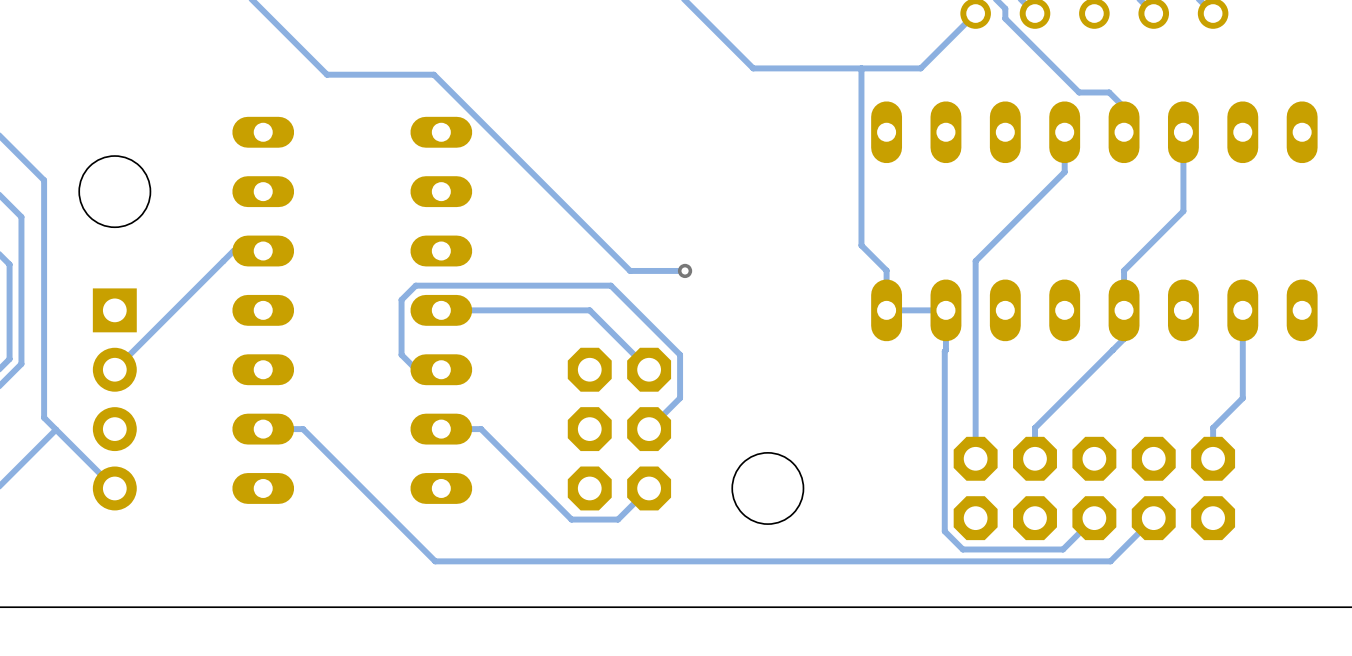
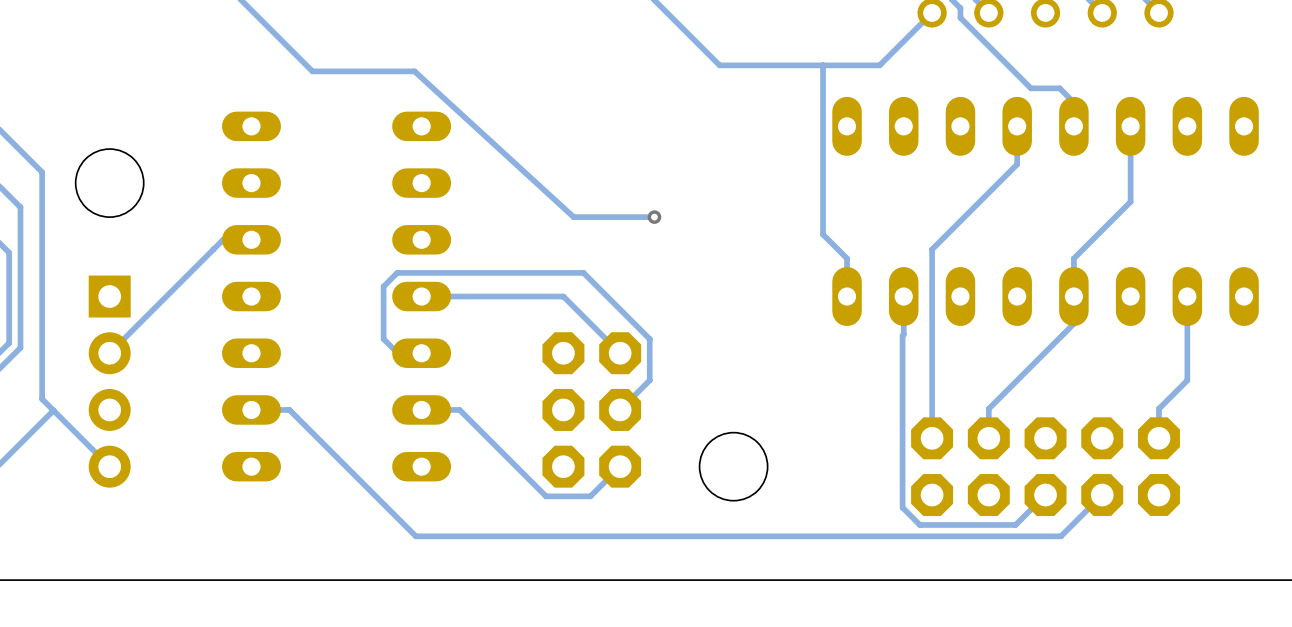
track: (433, 74) (630, 270) (685, 270) -> (414, 71) (573, 217) (654, 217)
via position: (685, 270) -> (654, 217)
track: (945, 310) (886, 310) -> none

